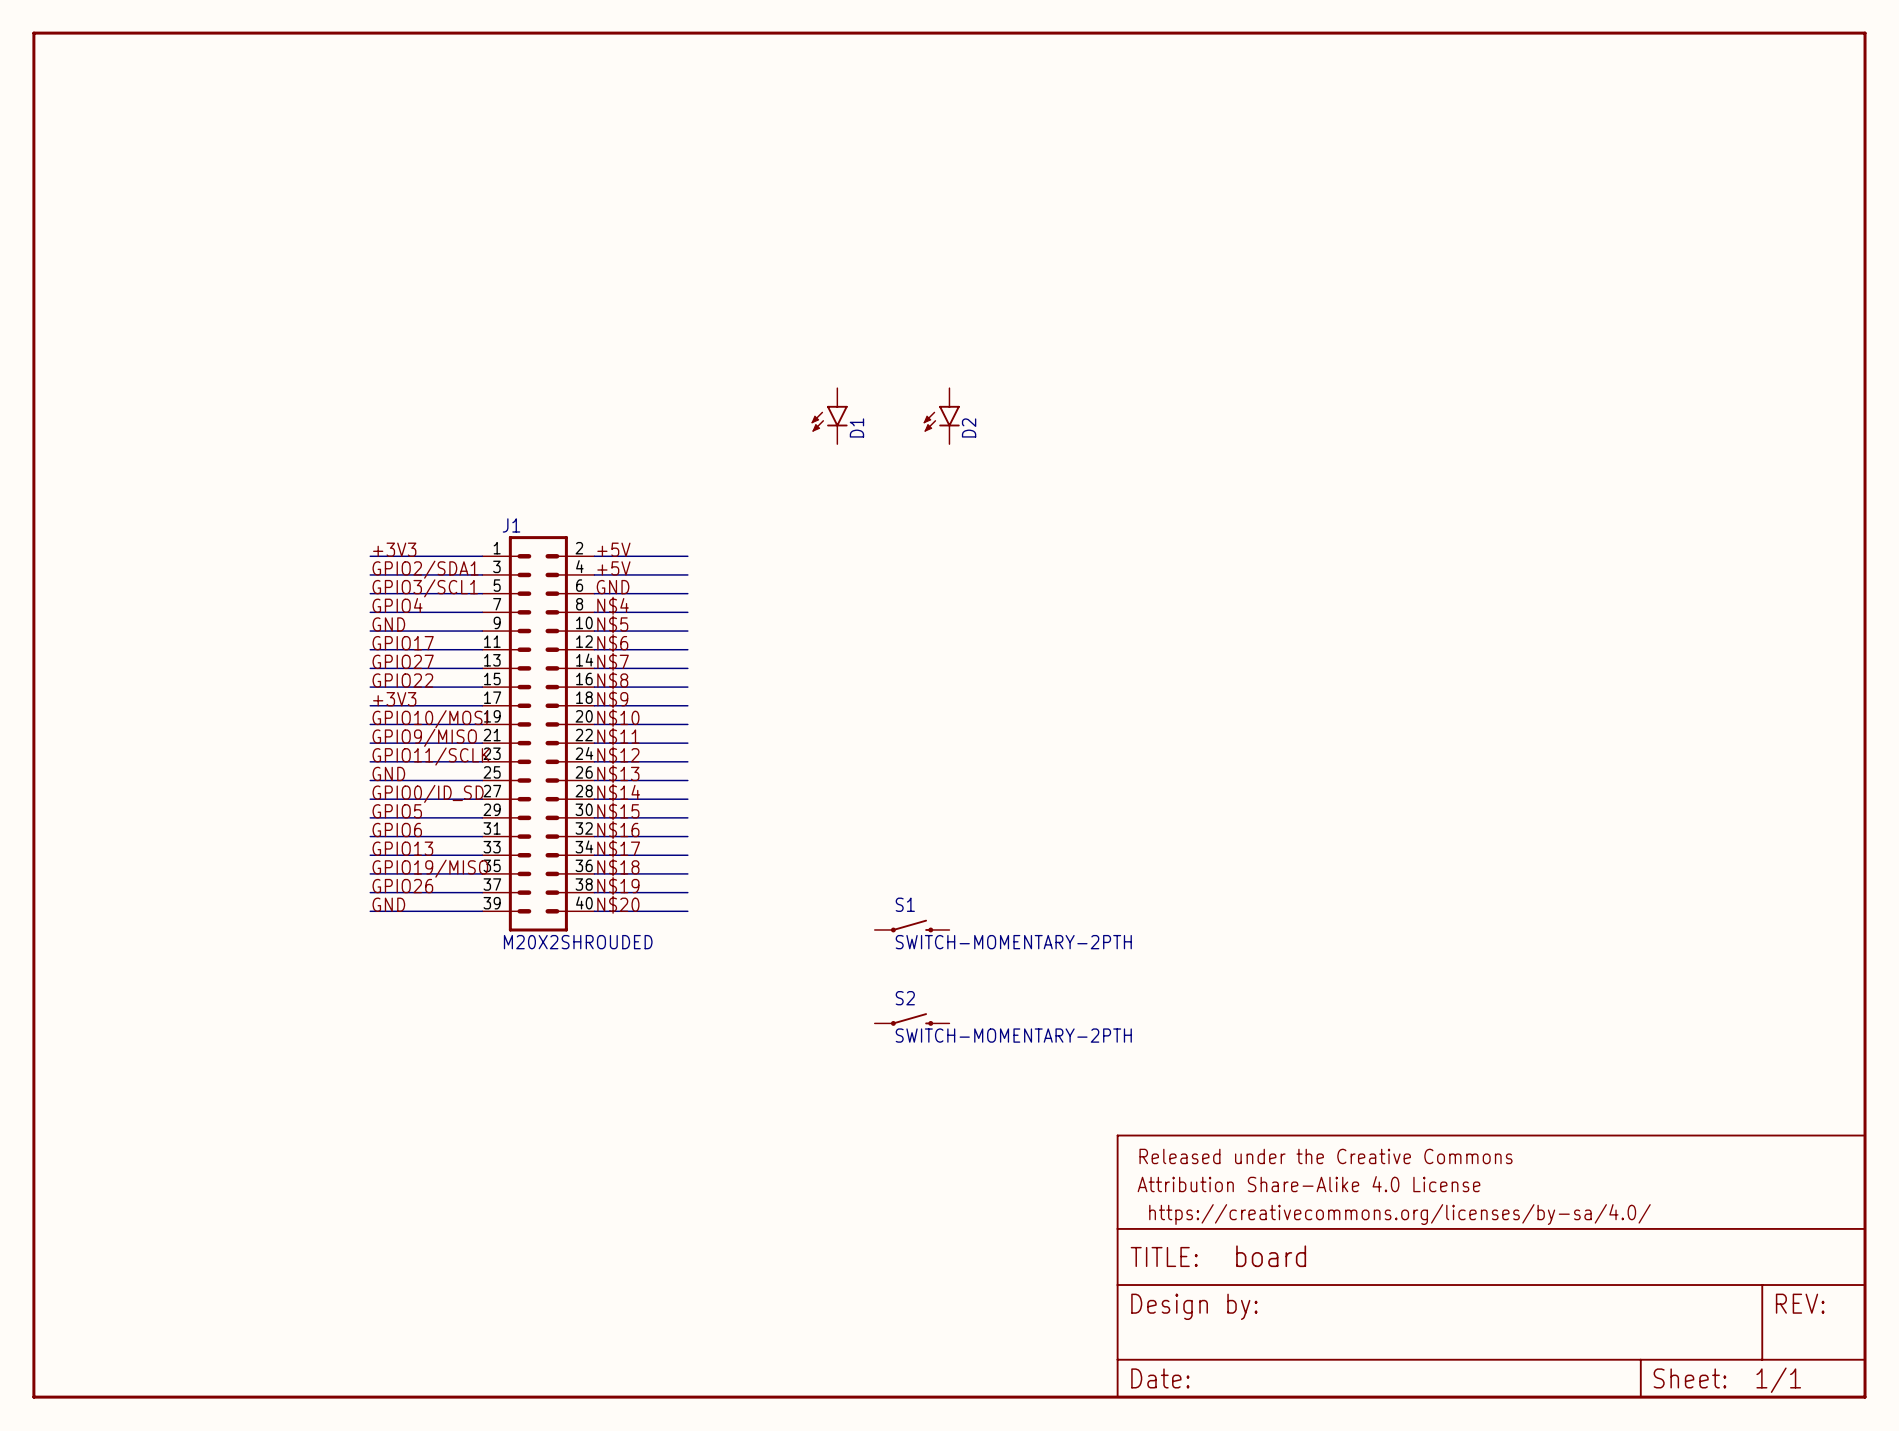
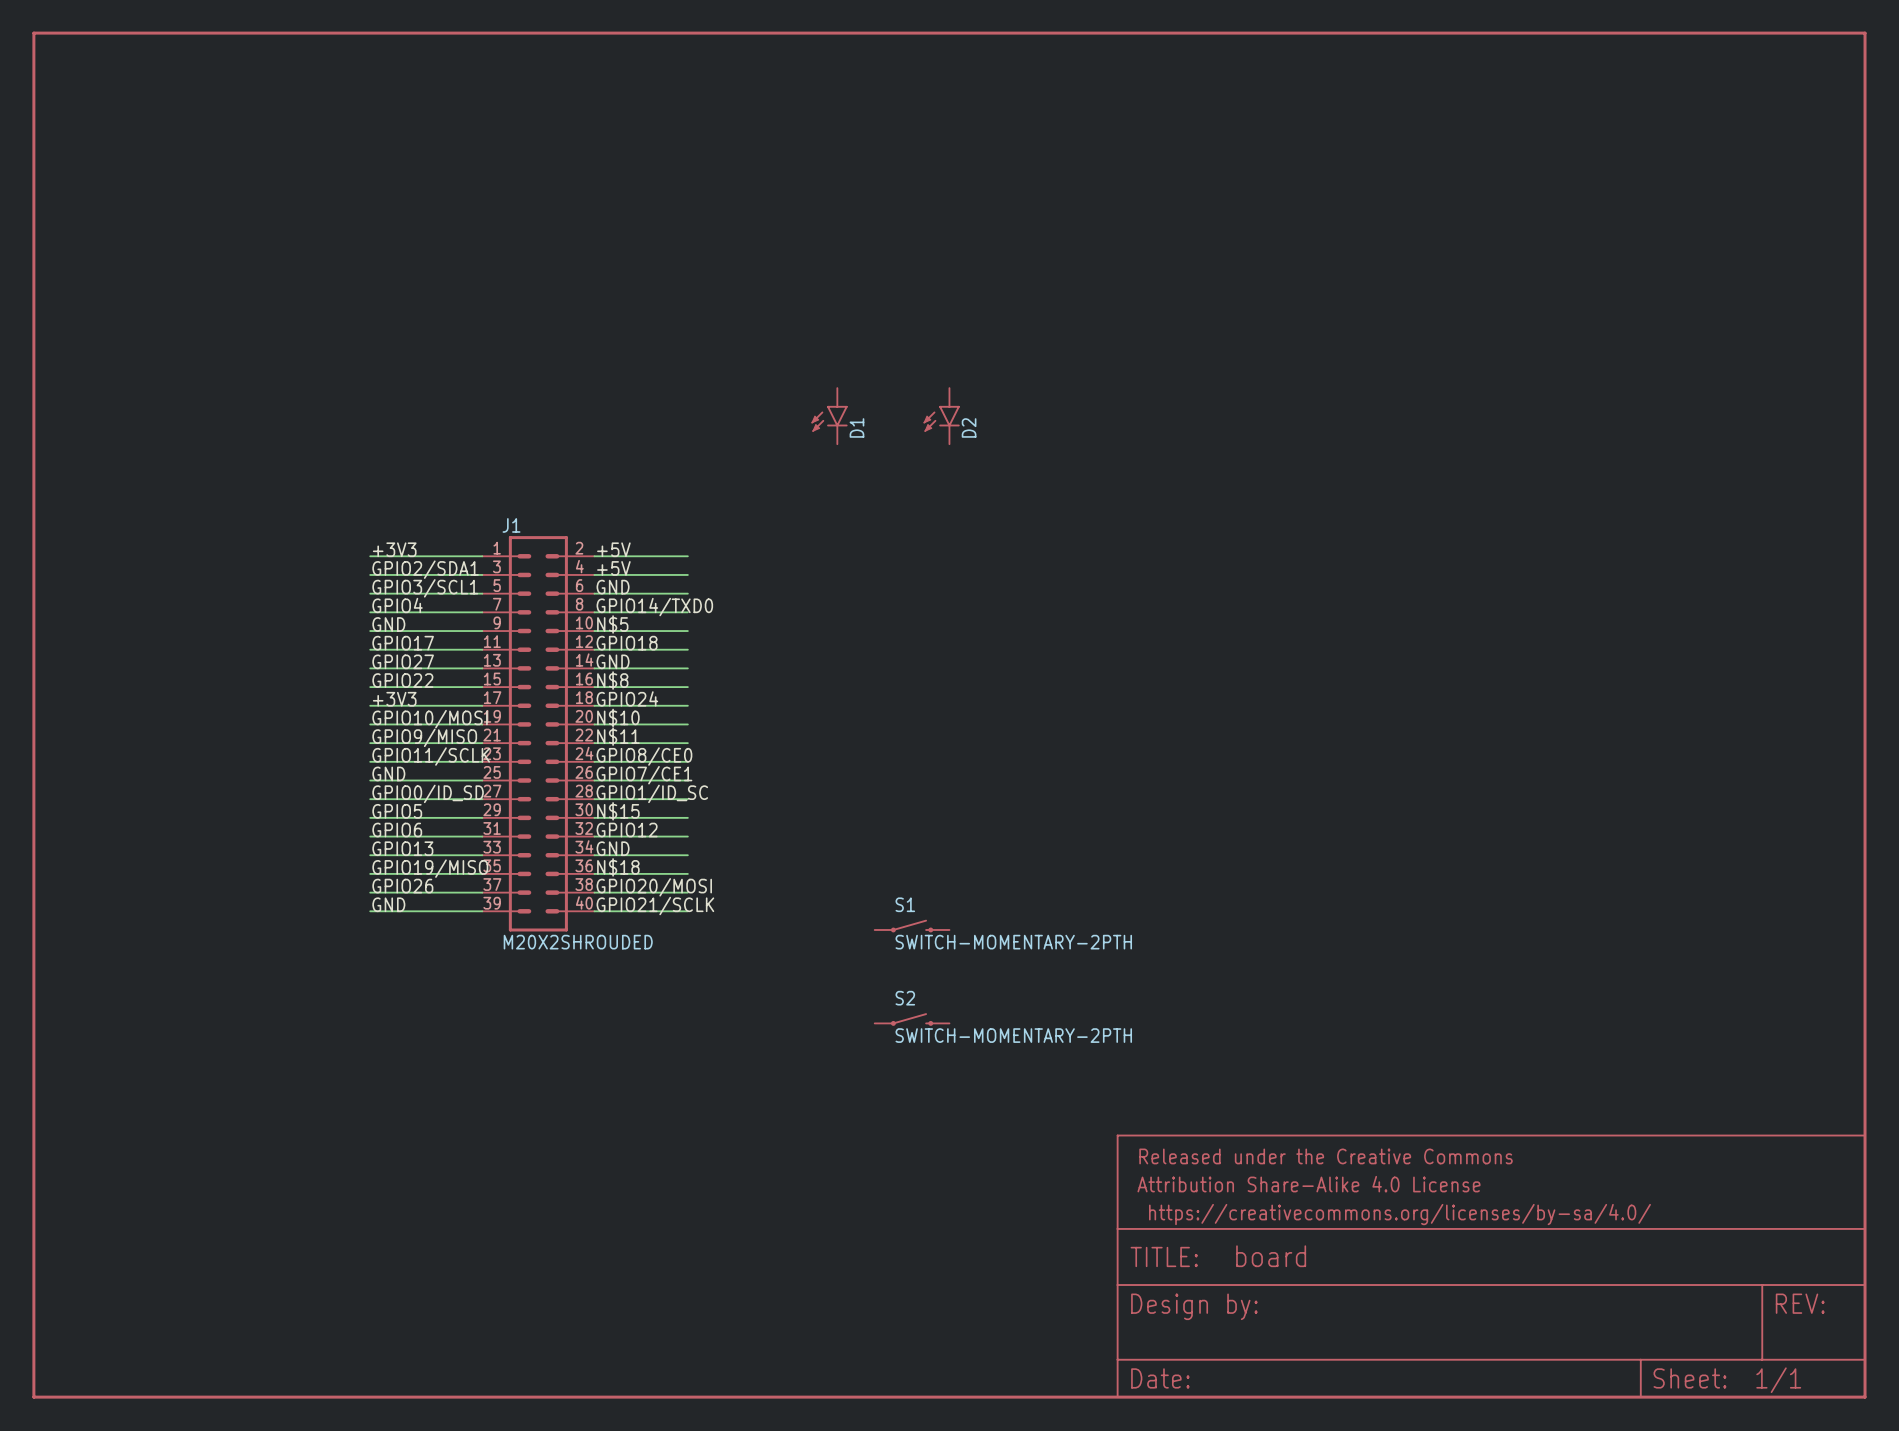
label: N$4 (613, 605) -> GPIO14/TXD0 (654, 607)
label: N$6 (612, 643) -> GPIO18 (627, 643)
label: N$7 (613, 661) -> GND (613, 661)
label: N$9 (612, 699) -> GPIO24 (627, 698)
label: N$12 (618, 755) -> GPIO8/CE0 (644, 756)
label: N$13 (618, 773) -> GPIO7/CE1 (644, 775)
label: N$14 (618, 792) -> GPIO1/ID_SC (652, 793)
label: N$16 (618, 830) -> GPIO12 (627, 830)
label: N$17 (618, 848) -> GND (613, 848)
label: N$19 (618, 886) -> GPIO20/MOSI (654, 887)
label: N$20 (618, 904) -> GPIO21/SCLK (655, 906)

